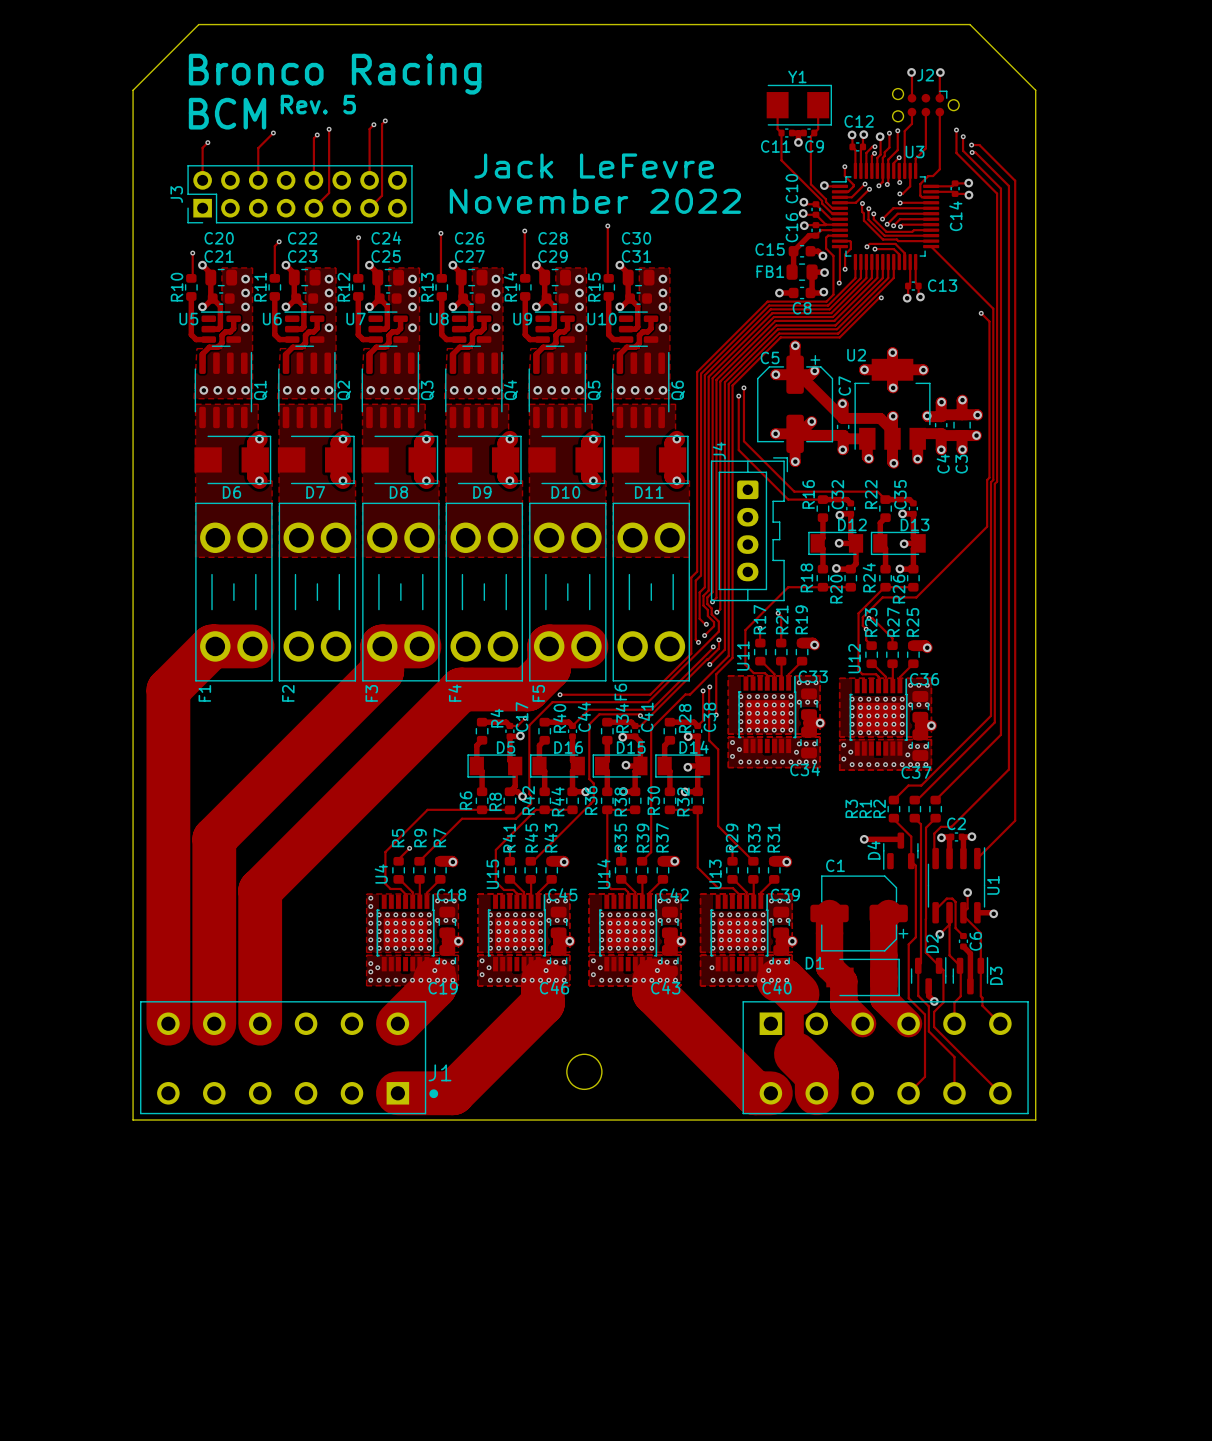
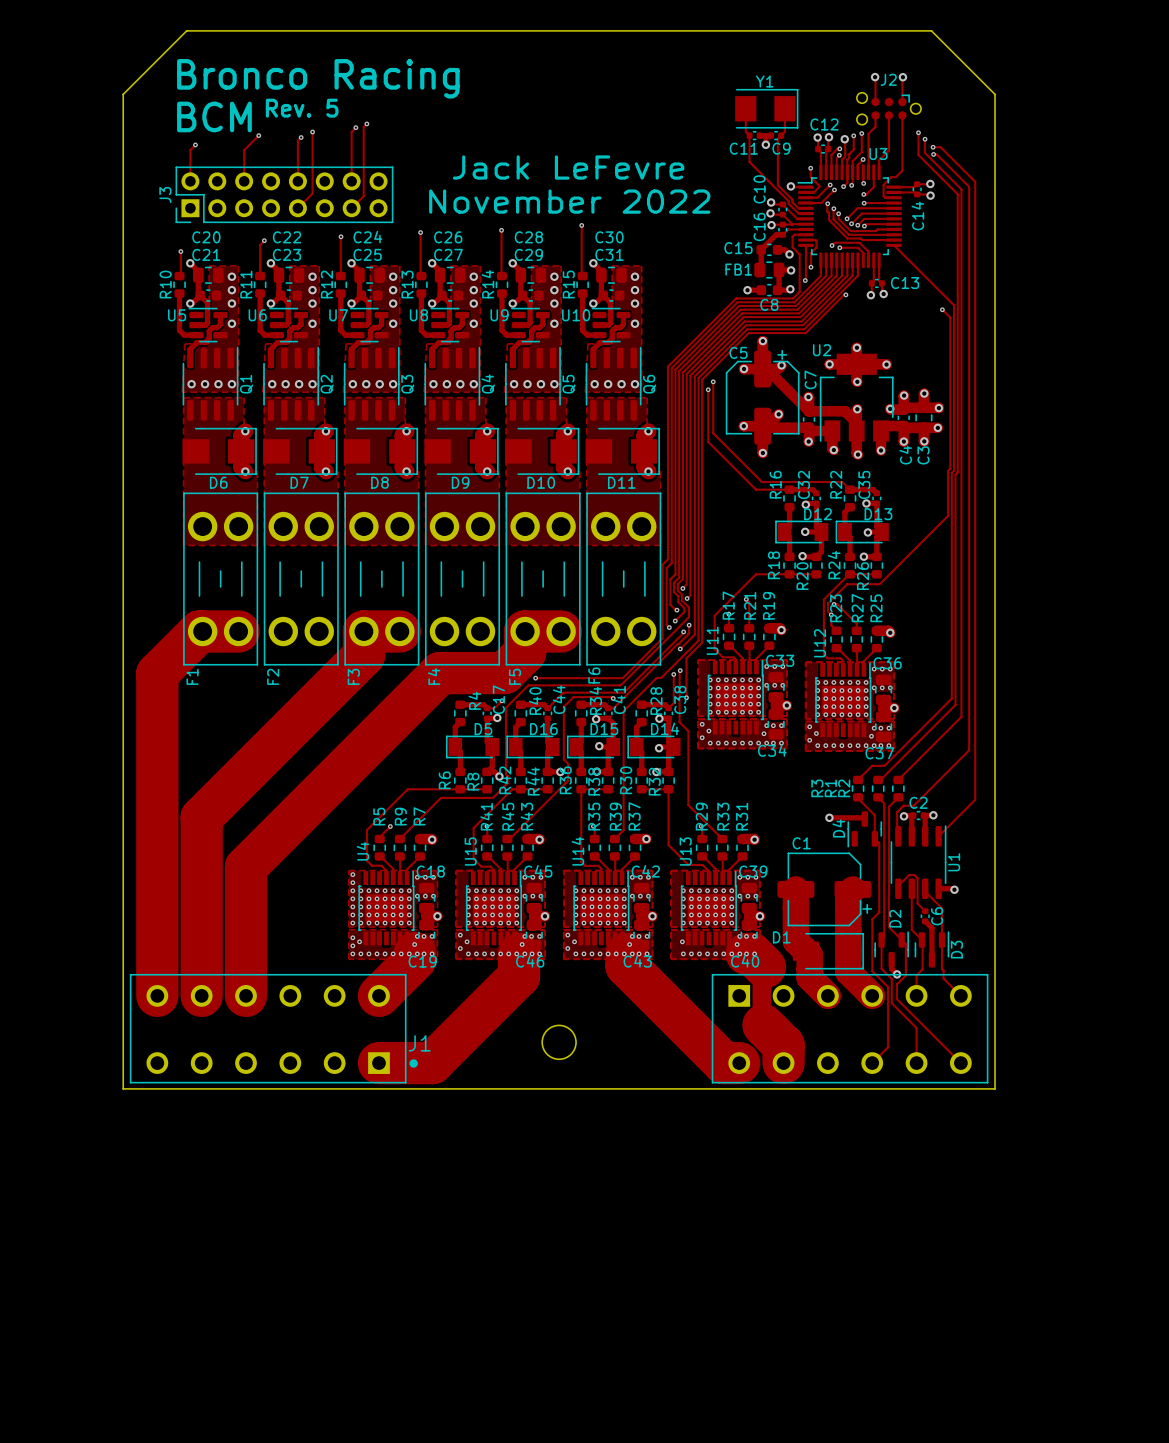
J4: (749, 529) -> none
track: (967, 892) (967, 908) (963, 912) -> none
via: (967, 892) -> none
track: (949, 924) (939, 934) -> none
via: (939, 934) -> none

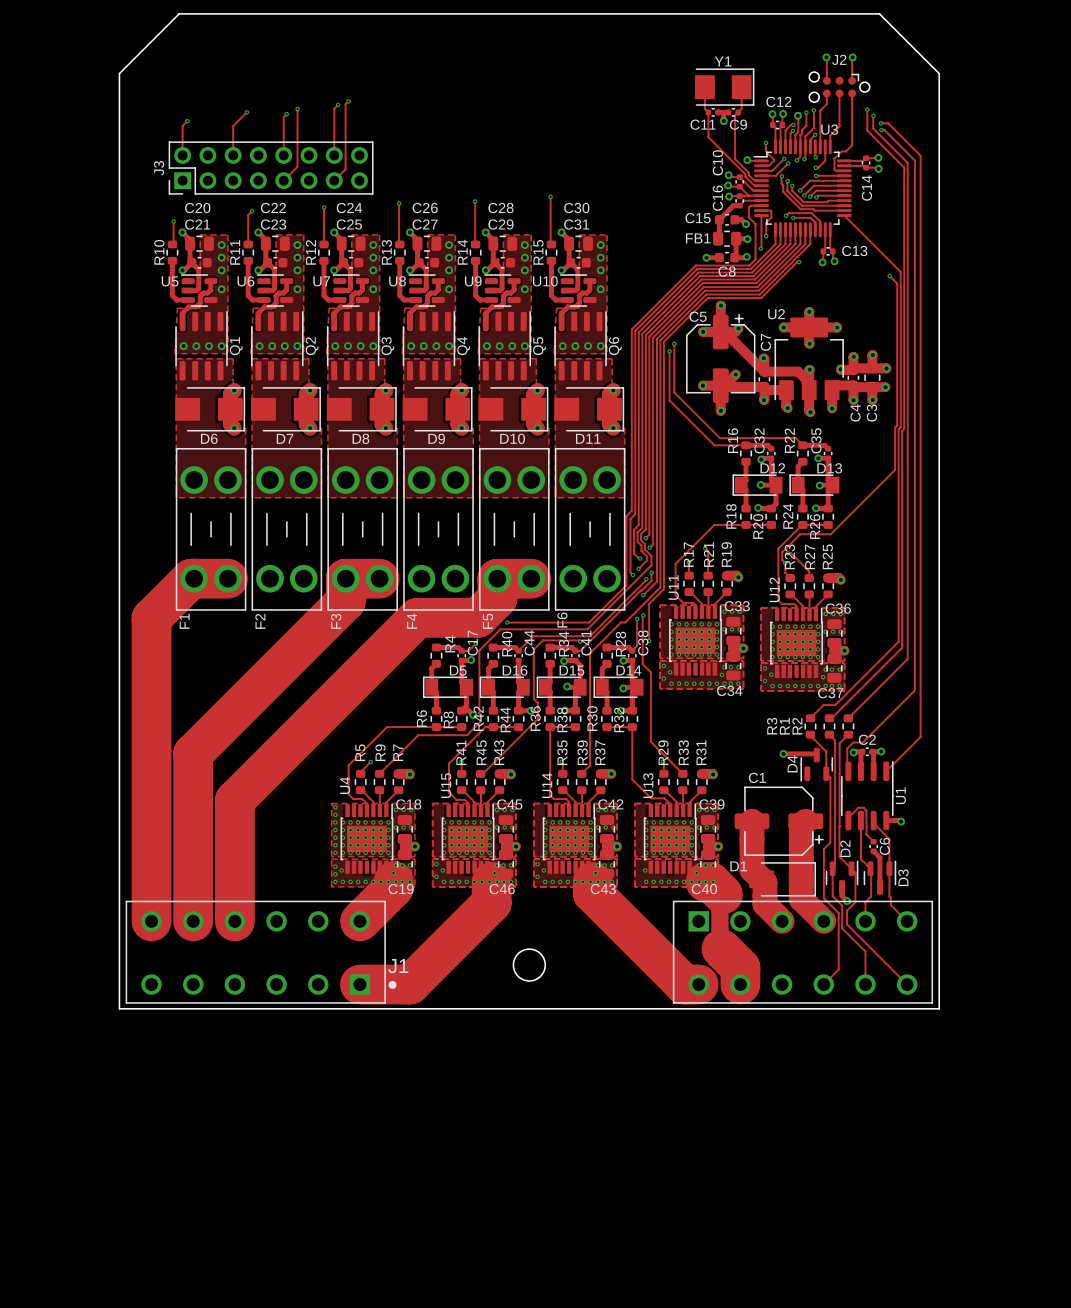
text: Bronco Racing (318, 78) -> none
text: Rev. 5 (302, 108) -> none
text: BCM (214, 116) -> none
text: Jack LeFevre (568, 167) -> none
text: November 2022 (569, 201) -> none

